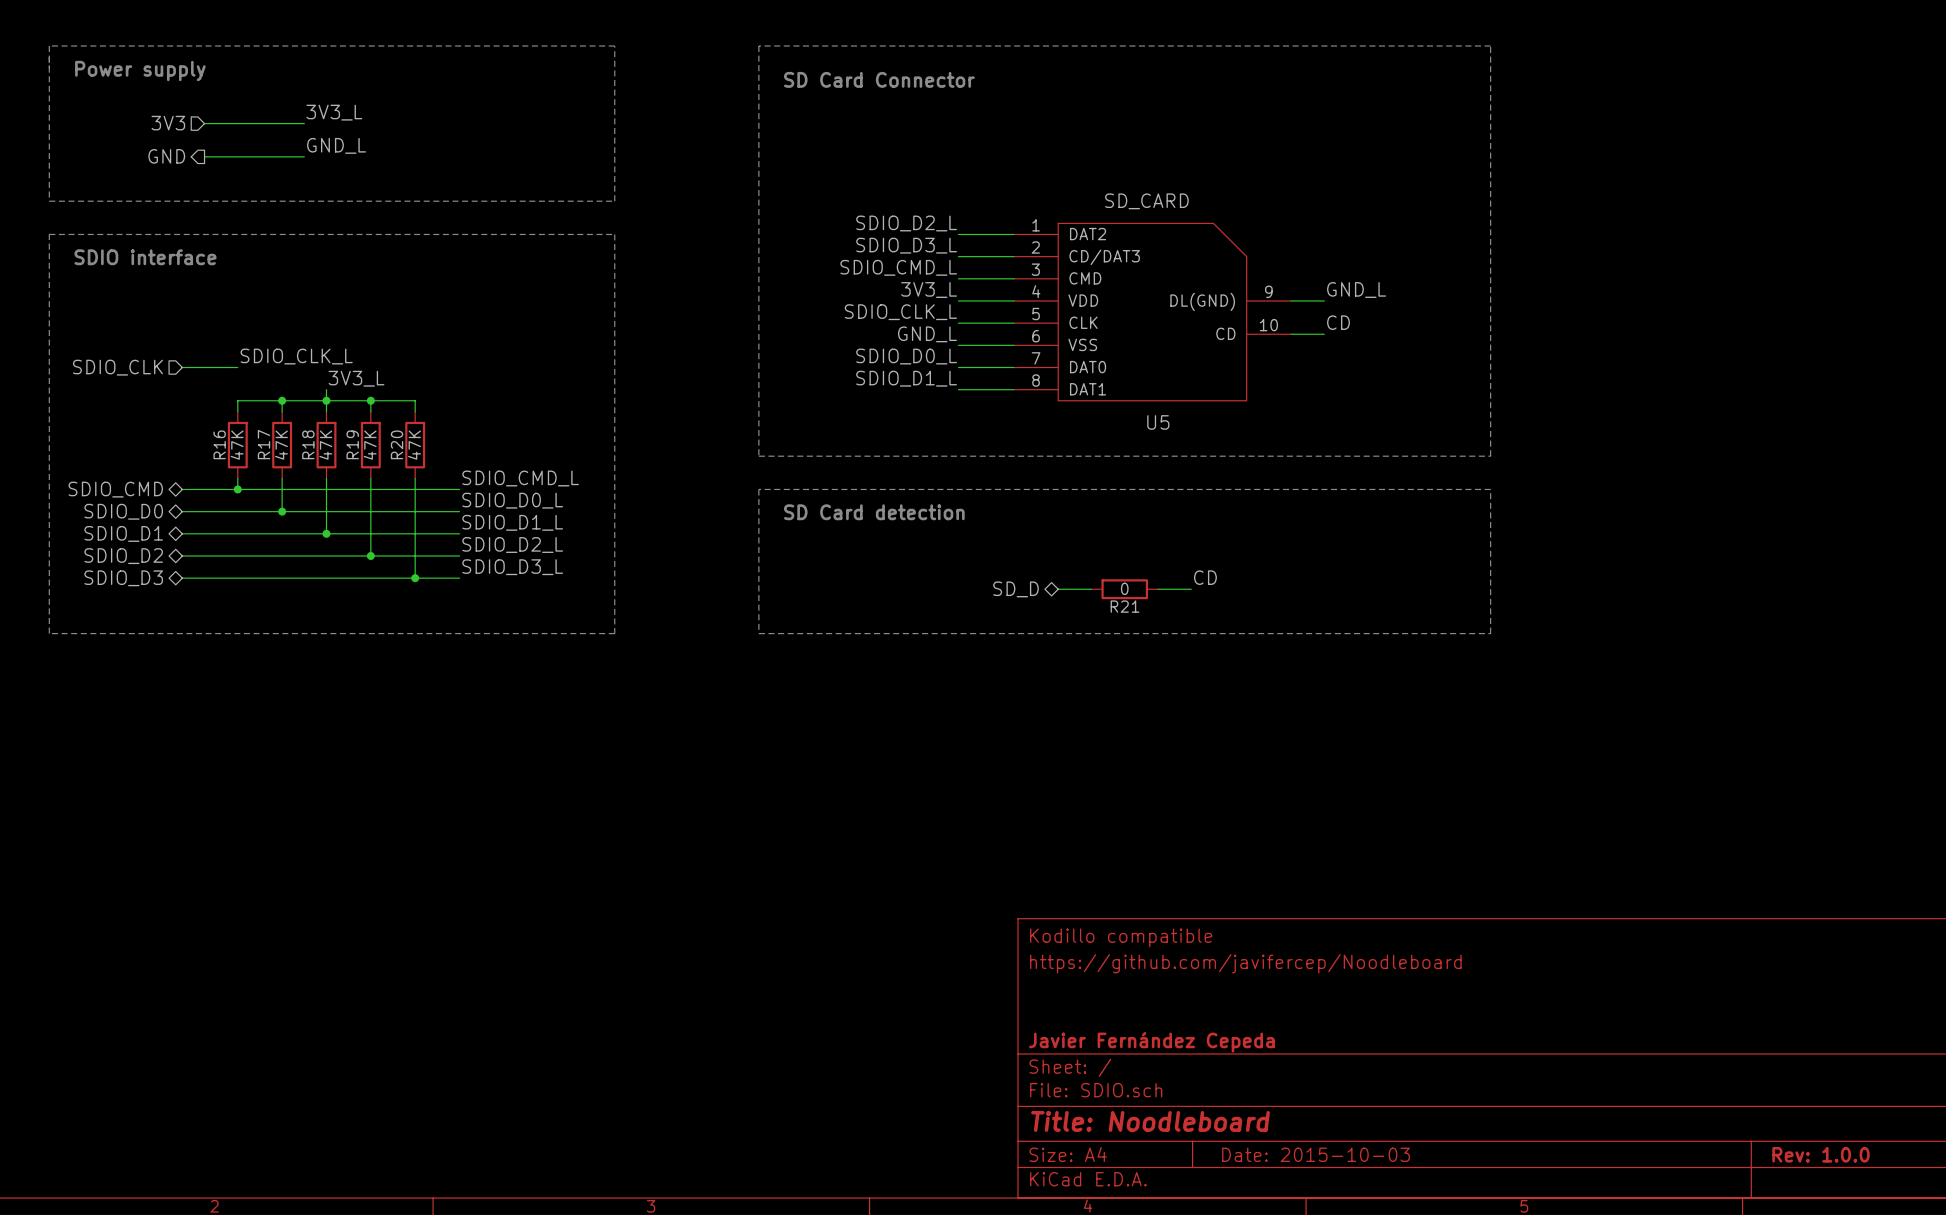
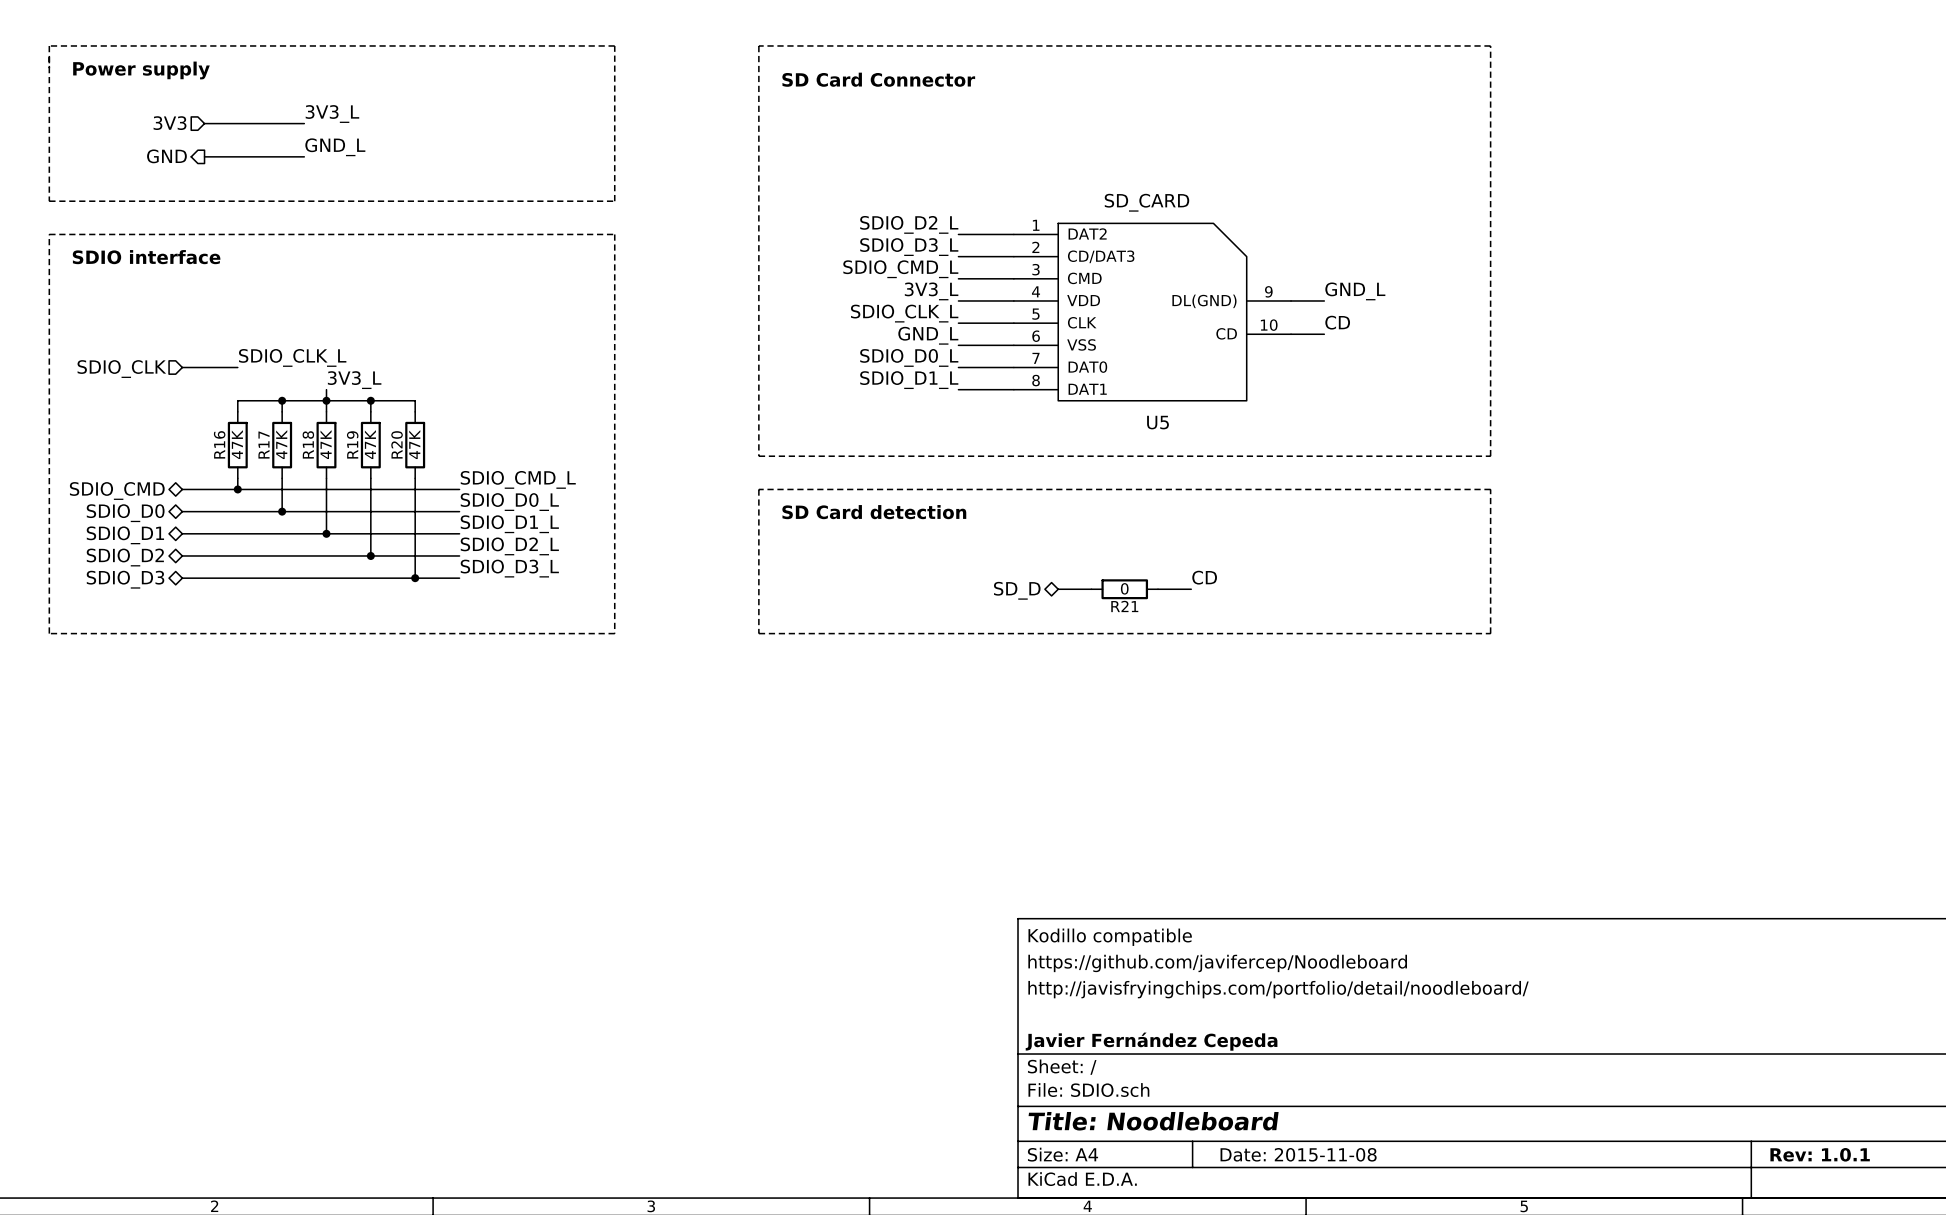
title block: none -> http://javisfryingchips.com/portfolio/detail/noodleboard/ (1278, 989)
title block: Date: 2015-10-03 (1316, 1154) -> Date: 2015-11-08 (1298, 1154)
title block: Rev: 1.0.0 (1821, 1154) -> Rev: 1.0.1 (1820, 1154)

